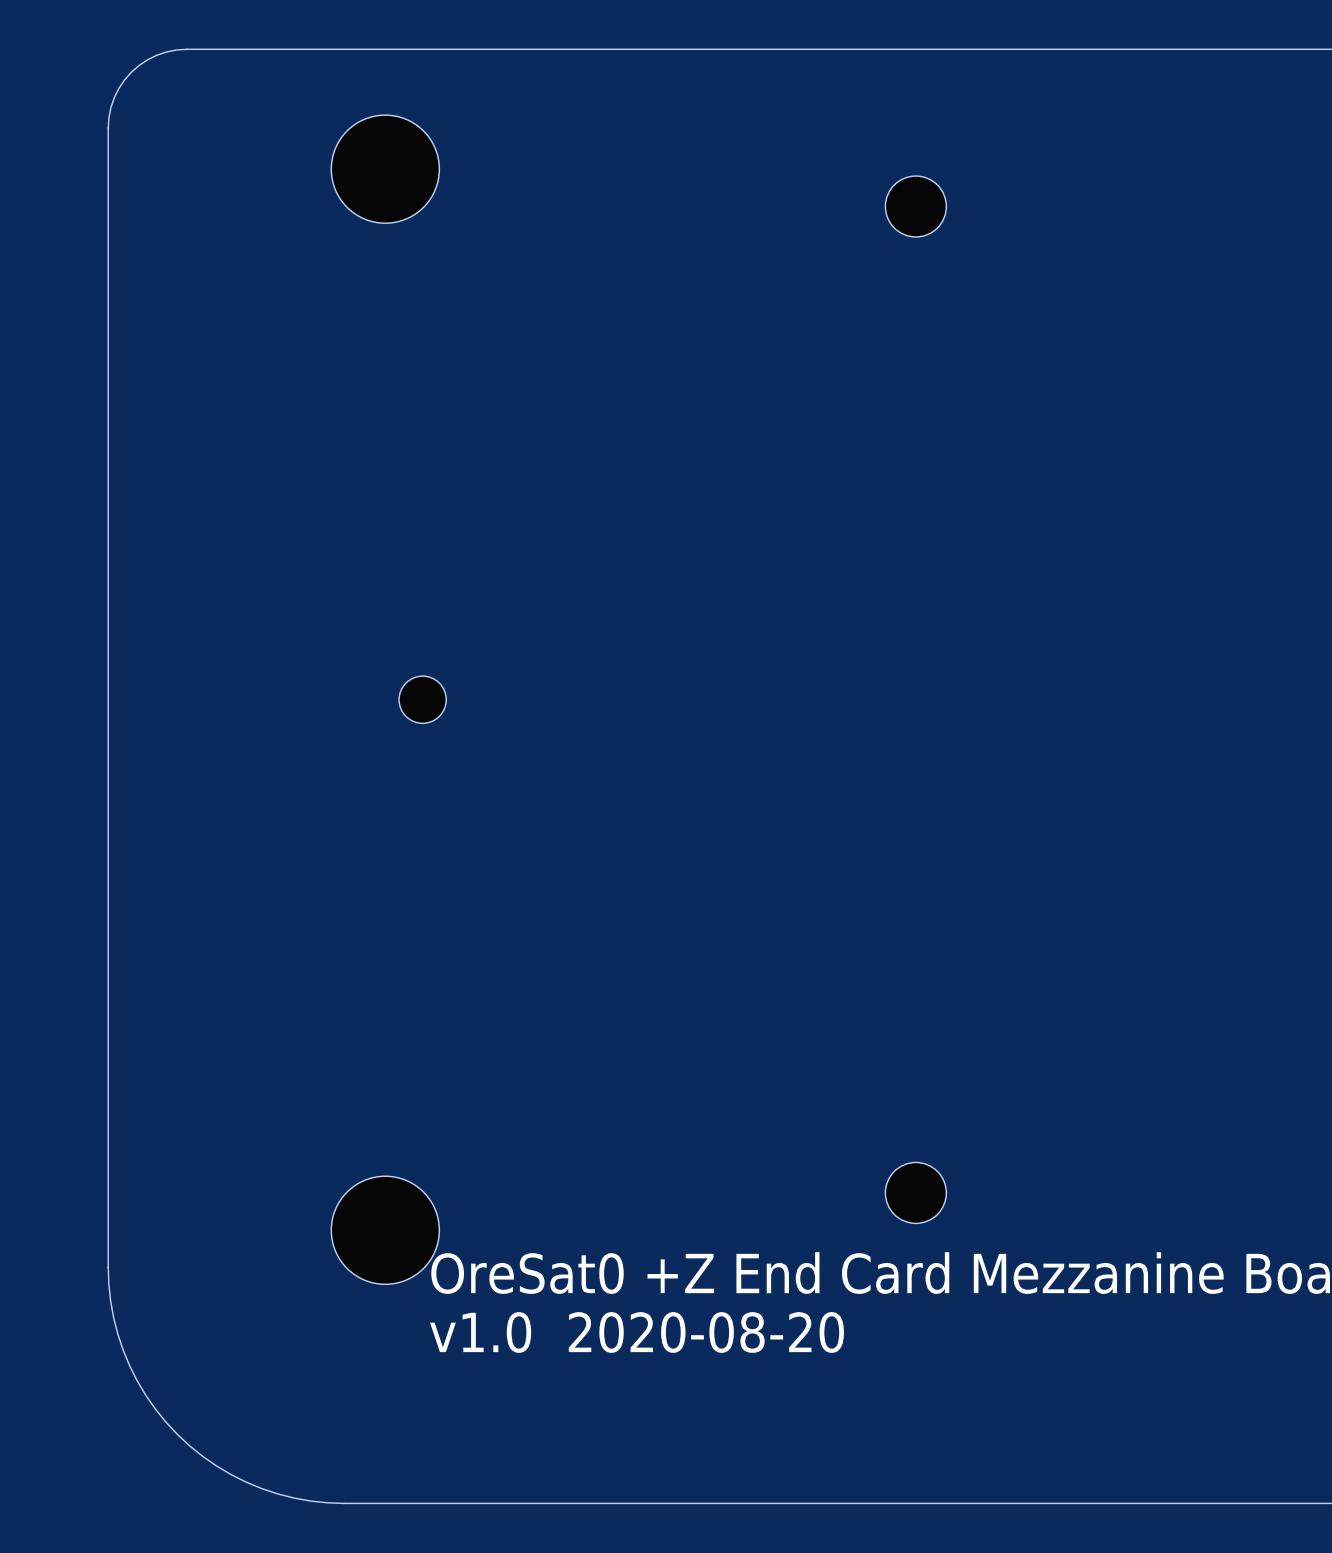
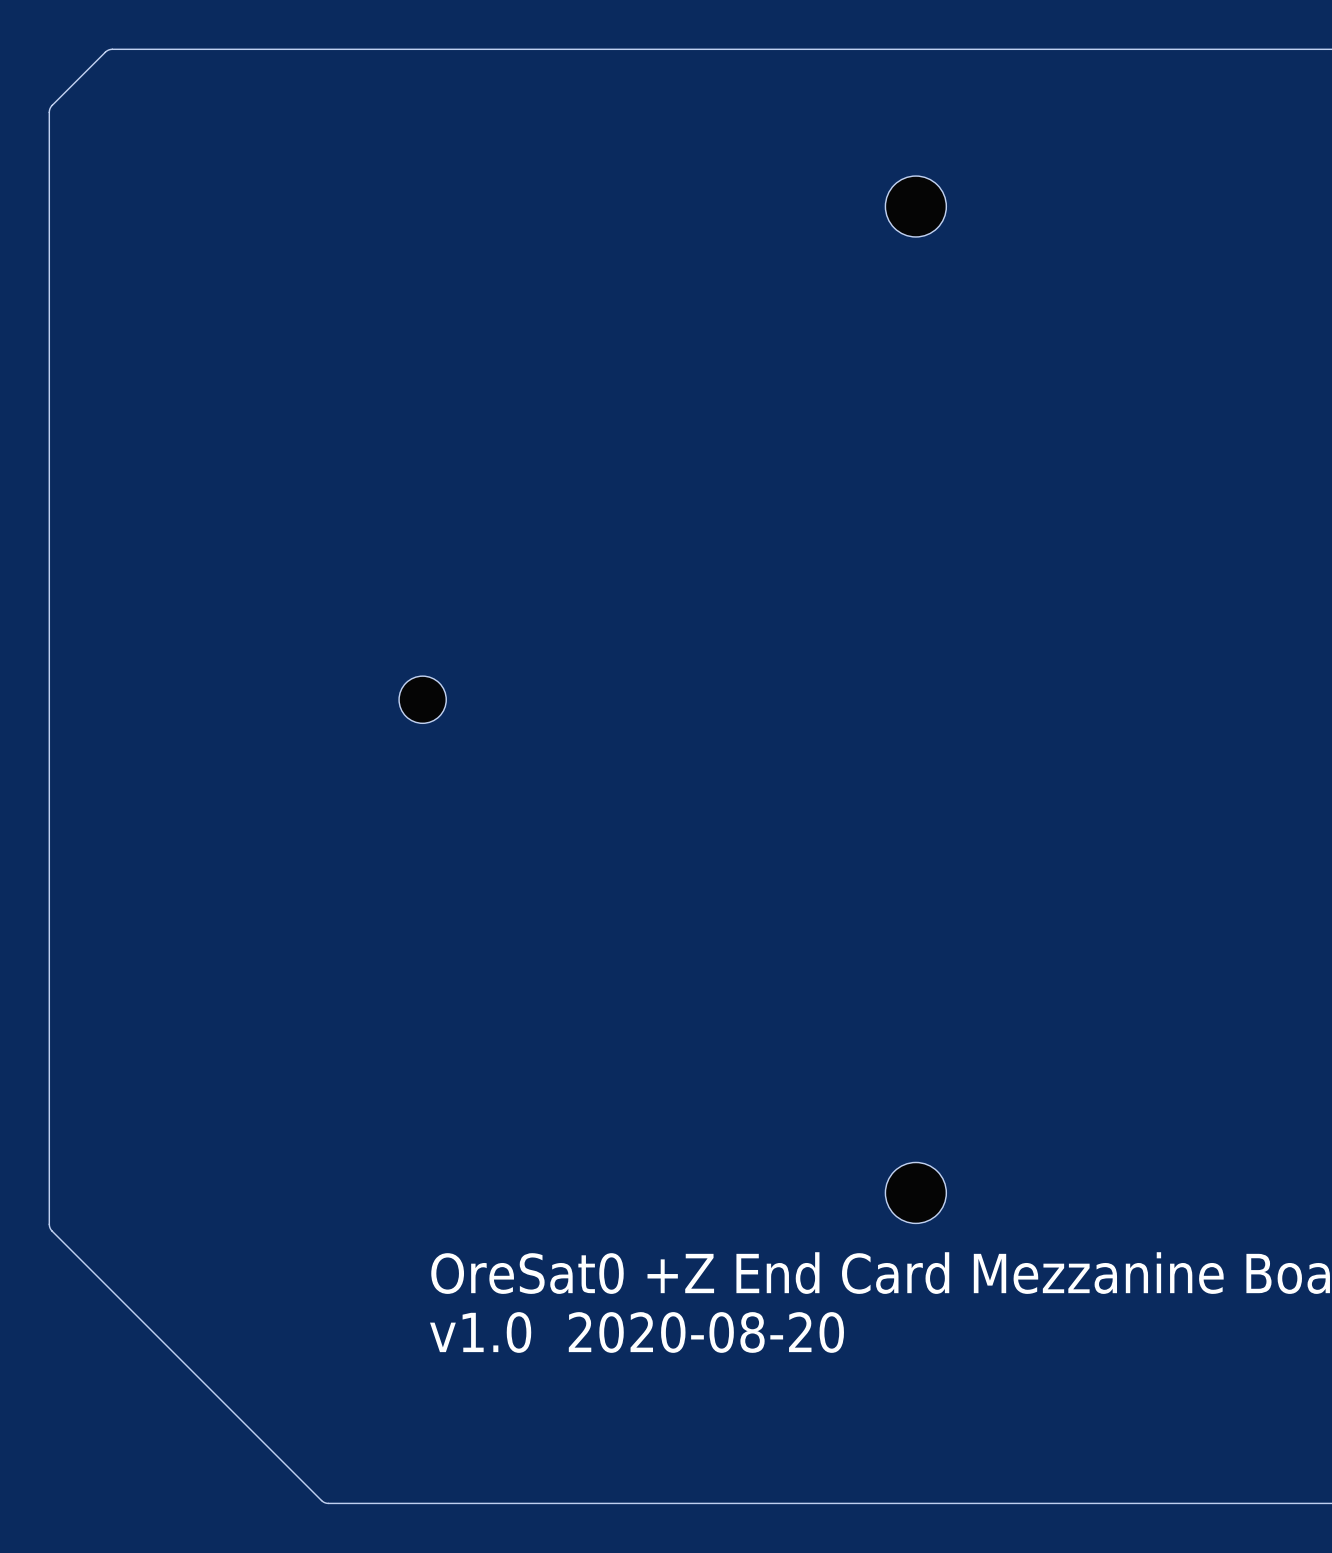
board edge: (186, 49) (156, 55) (131, 72) (114, 97) (108, 127) (108, 1267) (110, 1301) (123, 1350) (137, 1380) (155, 1408) (189, 1445) (216, 1465) (261, 1488) (310, 1501) (344, 1503) -> (186, 49) (108, 50) (52, 105) (49, 111) (49, 1225) (52, 1231) (321, 1500) (327, 1503) (344, 1503)
hole: (385, 169) -> none
hole: (385, 1230) -> none

